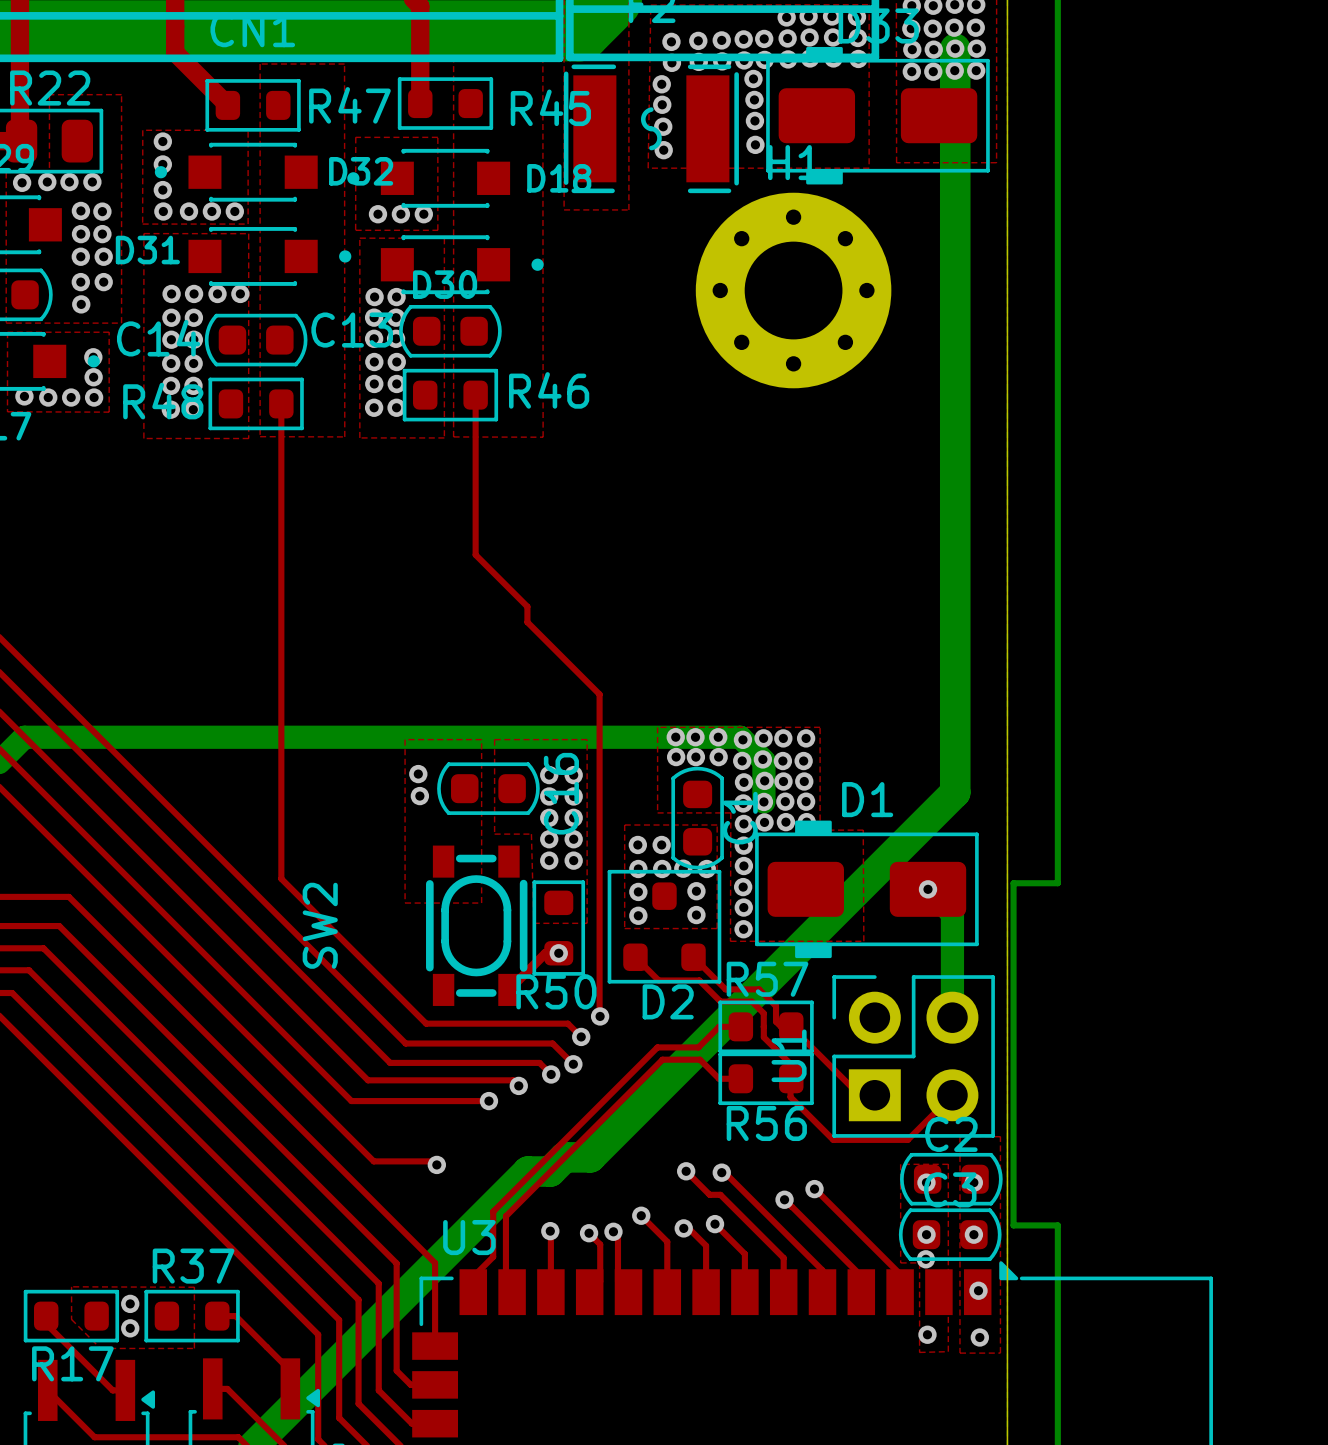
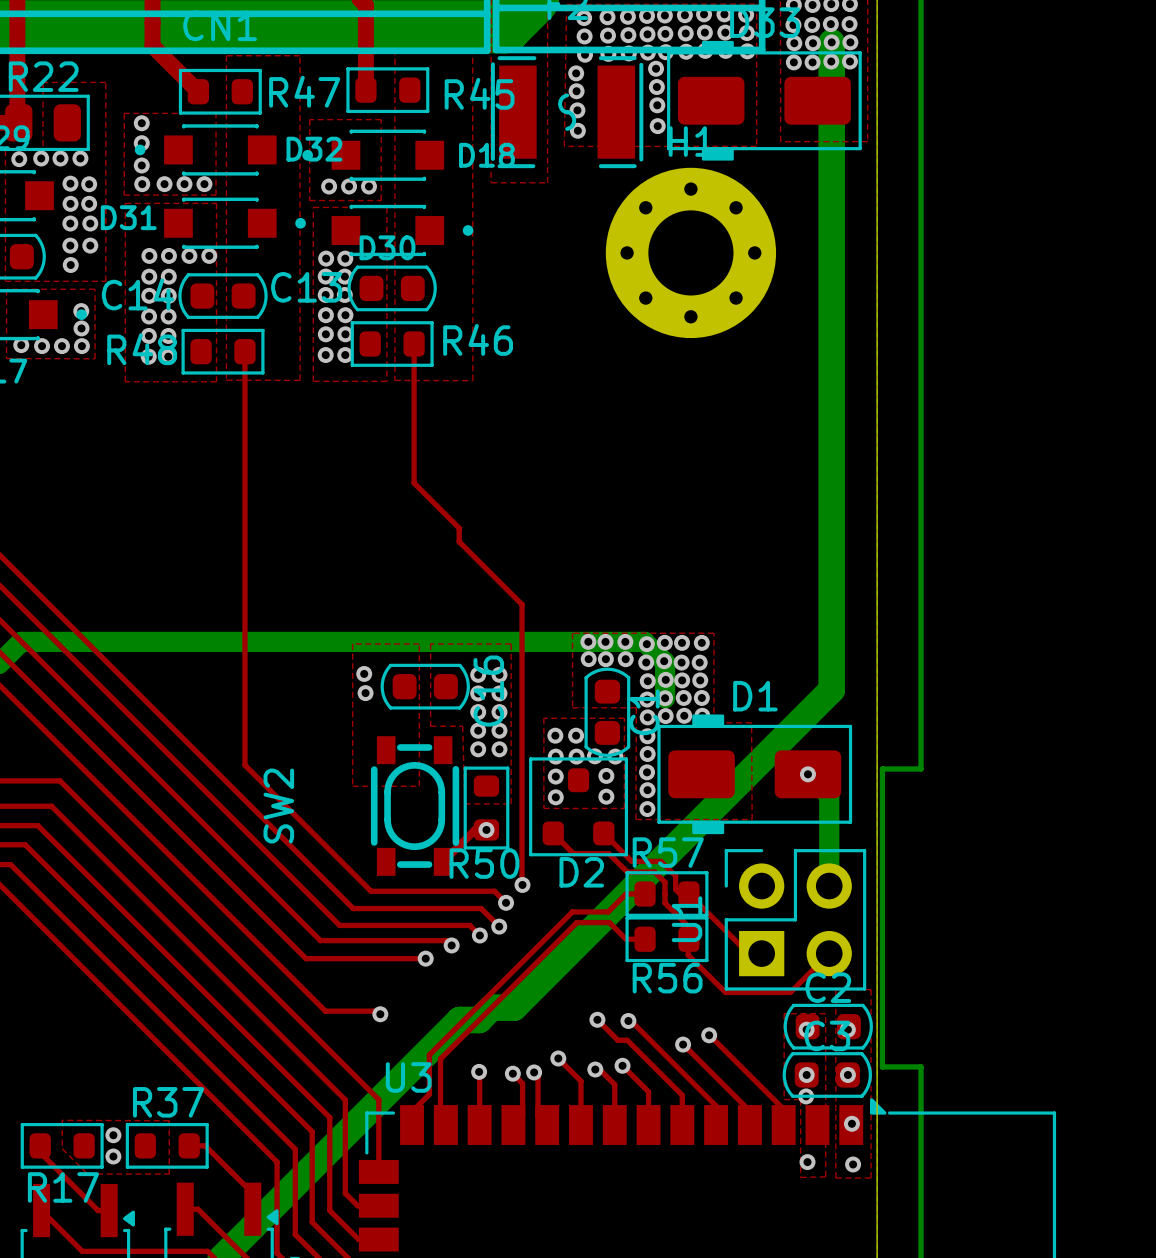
via: none -> (664, 15)
via: none -> (647, 15)
via: none -> (607, 17)
via: none -> (627, 16)
via: none -> (584, 18)

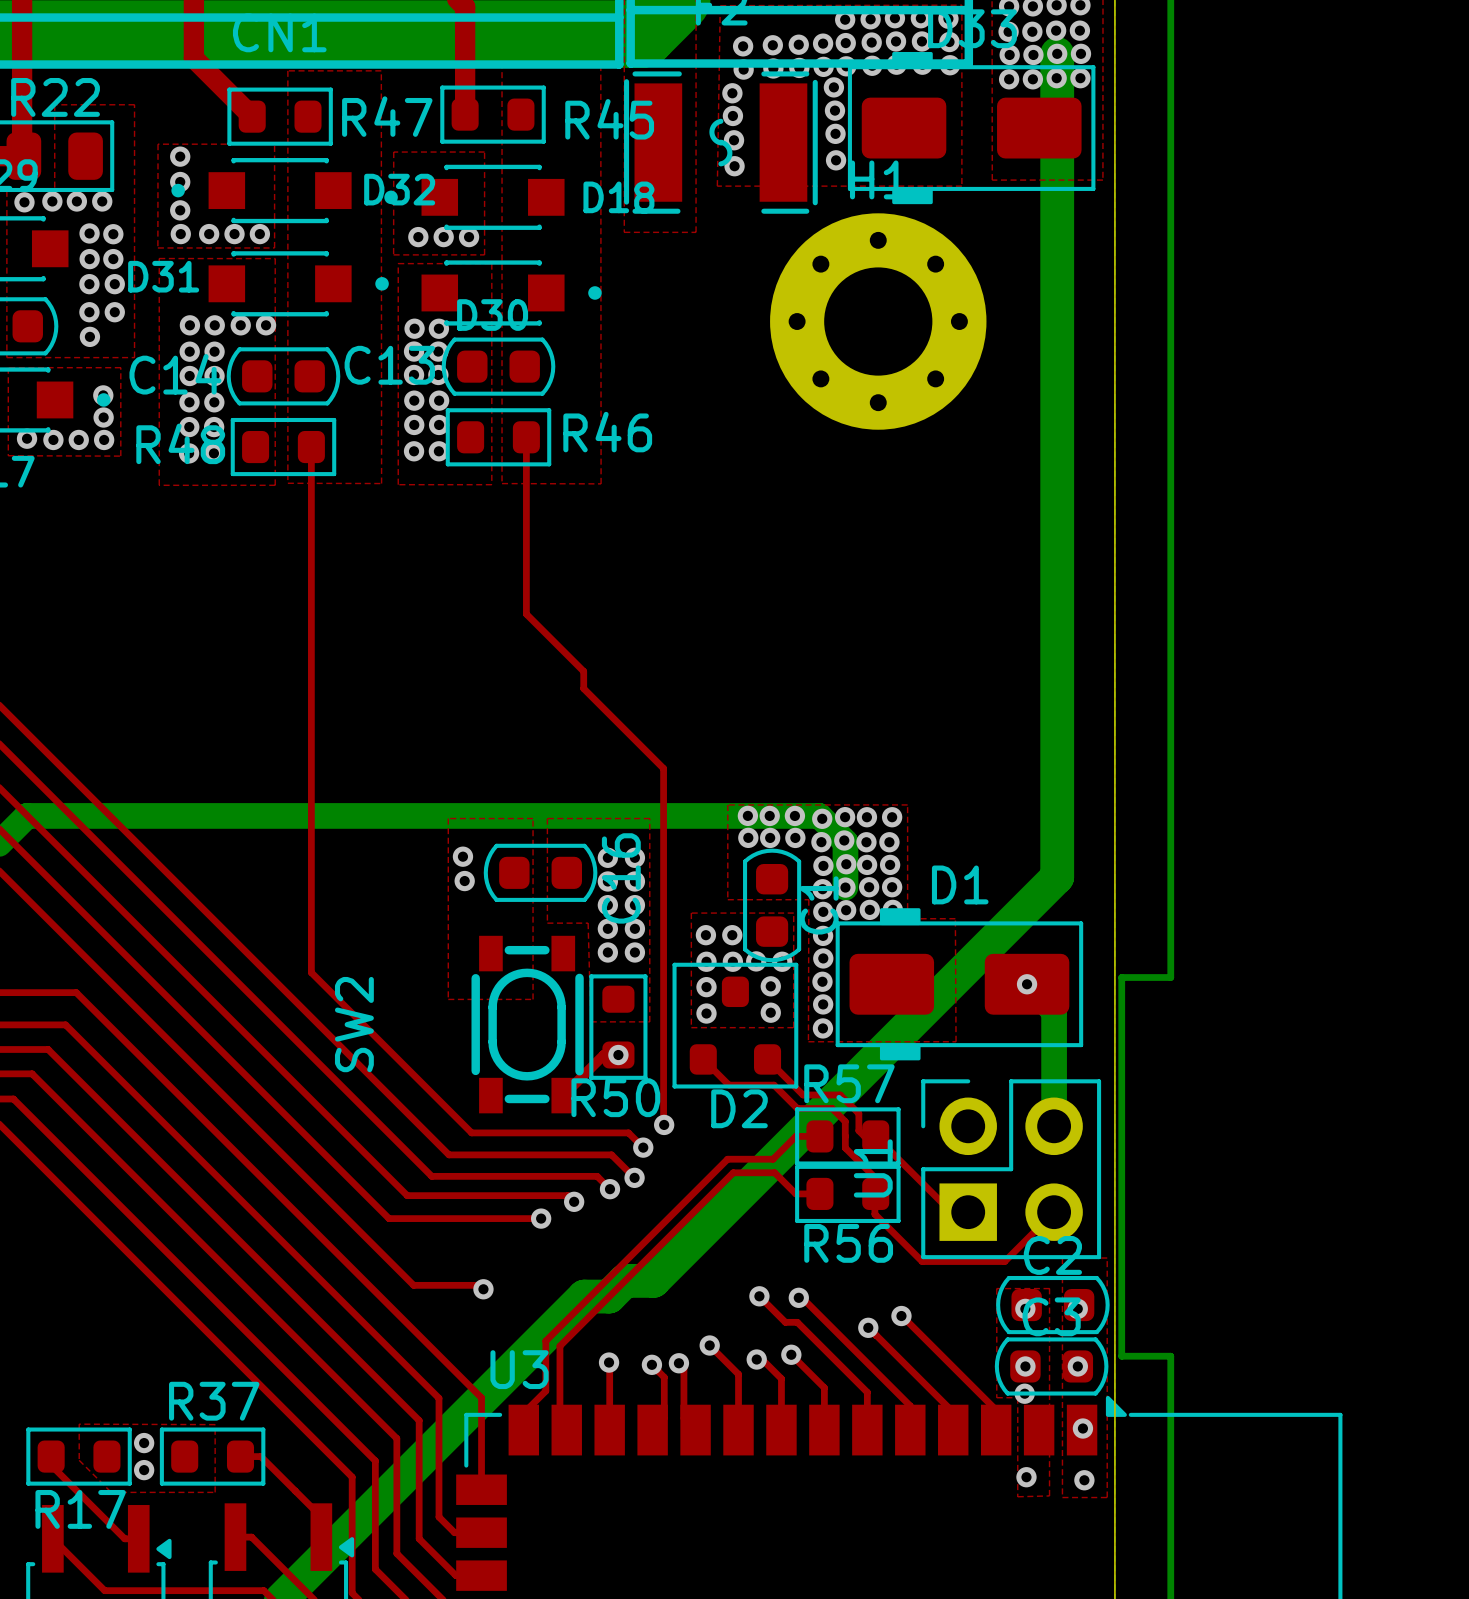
via: (647, 15) -> none
via: (627, 16) -> none
via: (607, 17) -> none
via: (584, 18) -> none

